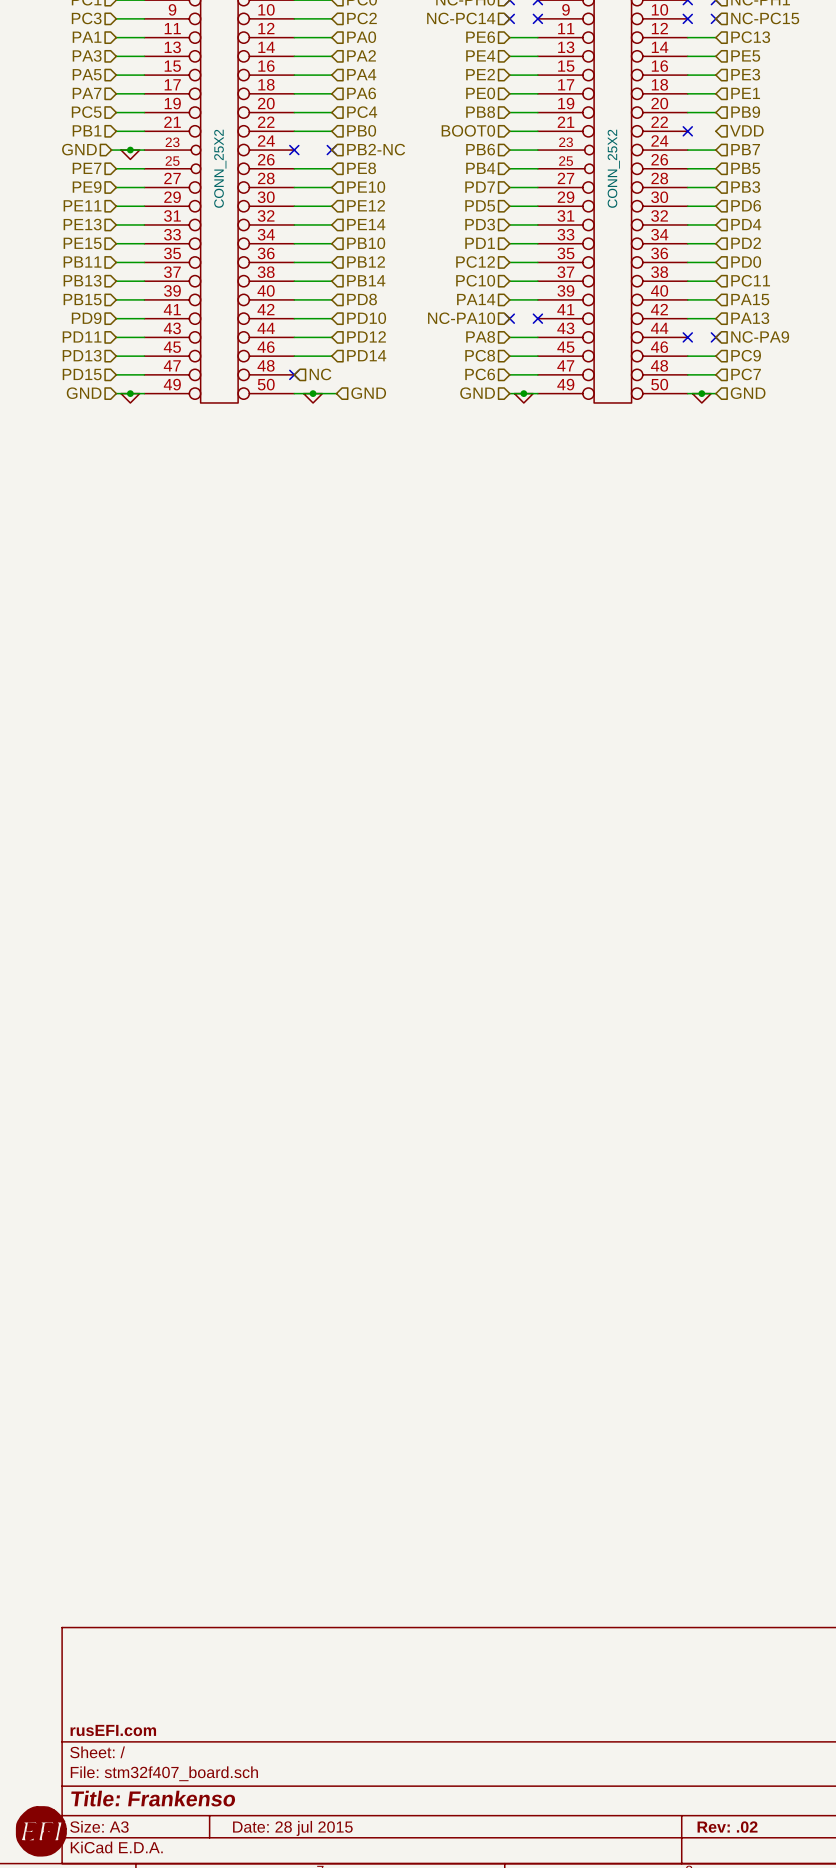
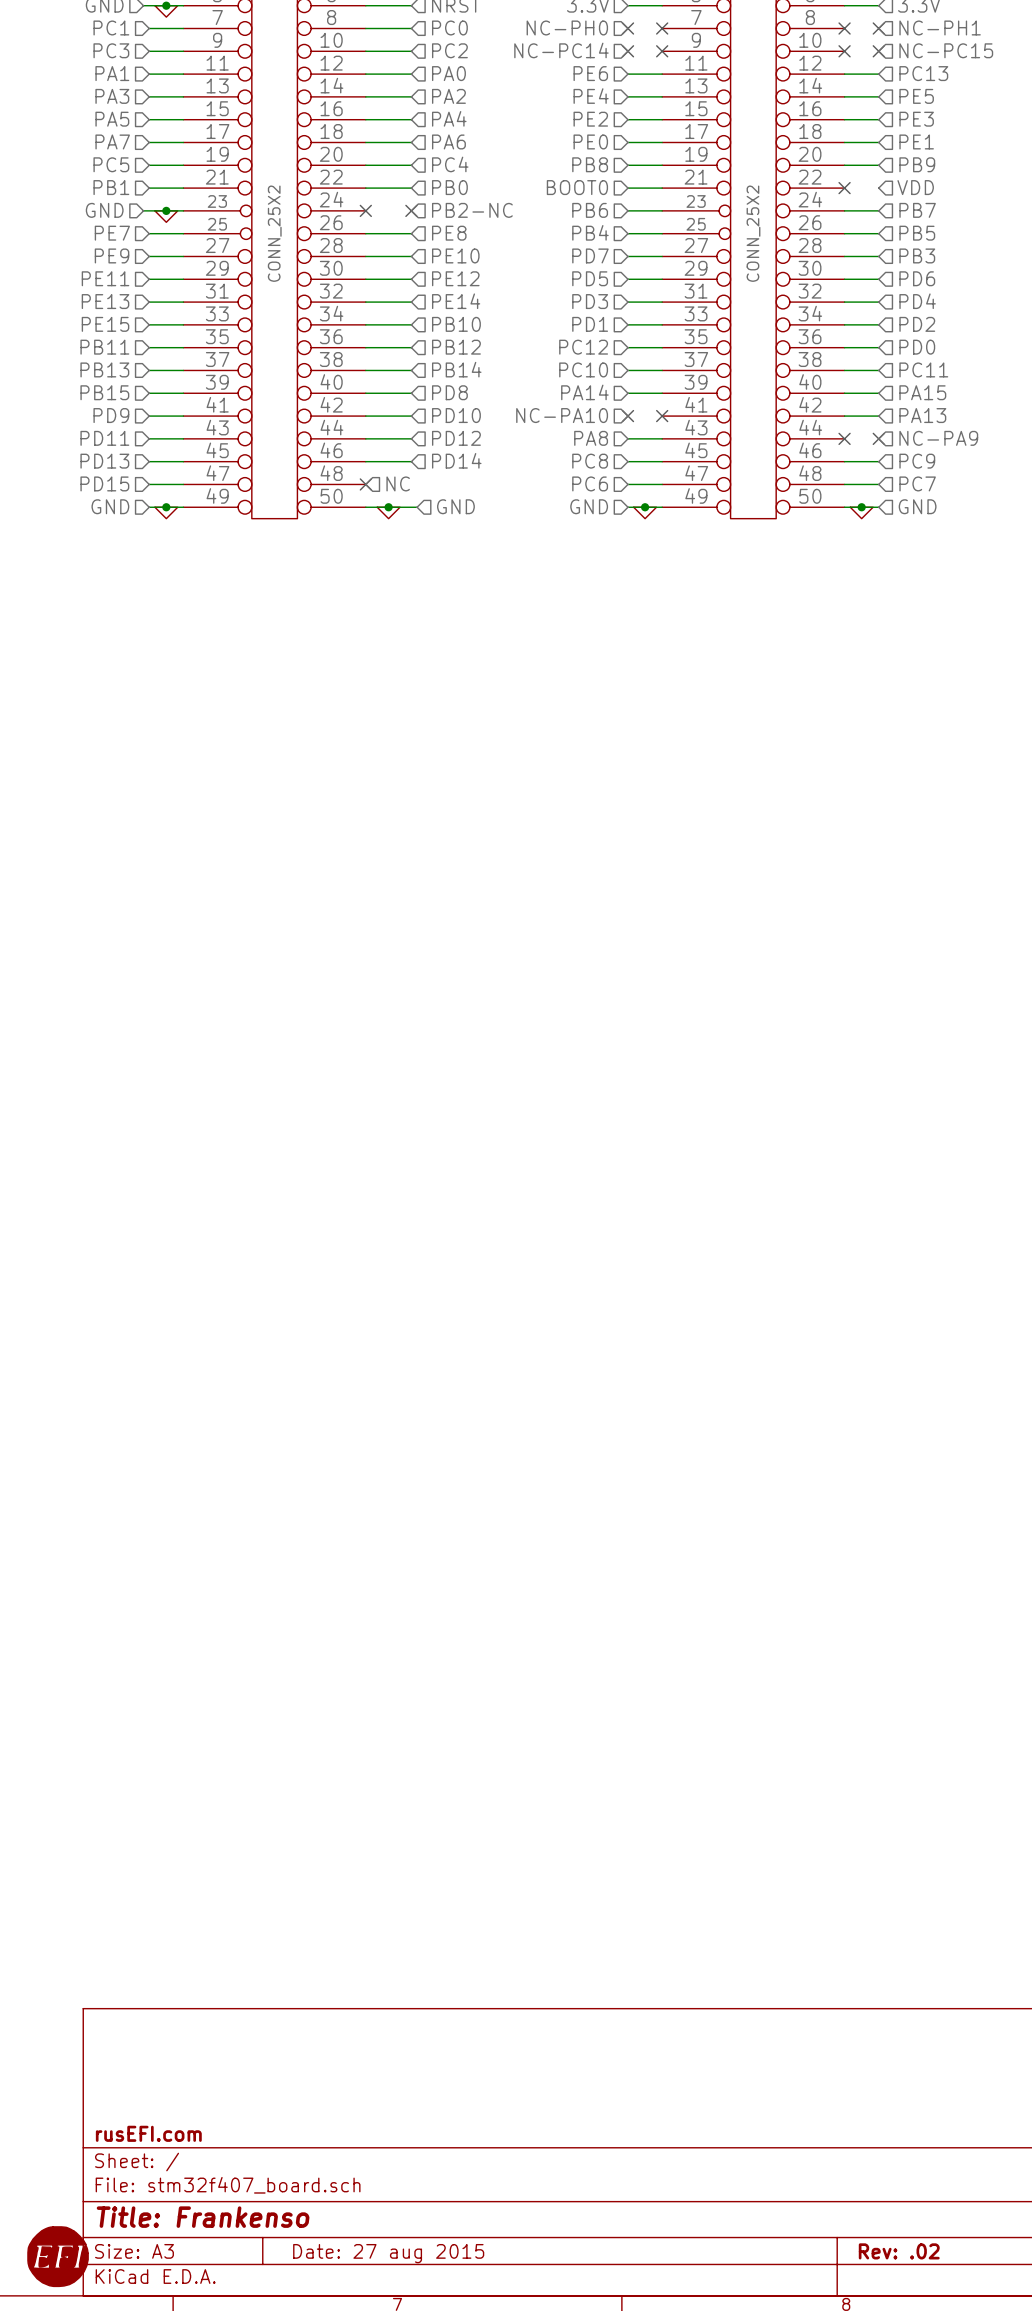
title block: Date: 28 jul 2015 (292, 1828) -> Date: 27 aug 2015 (388, 2253)

